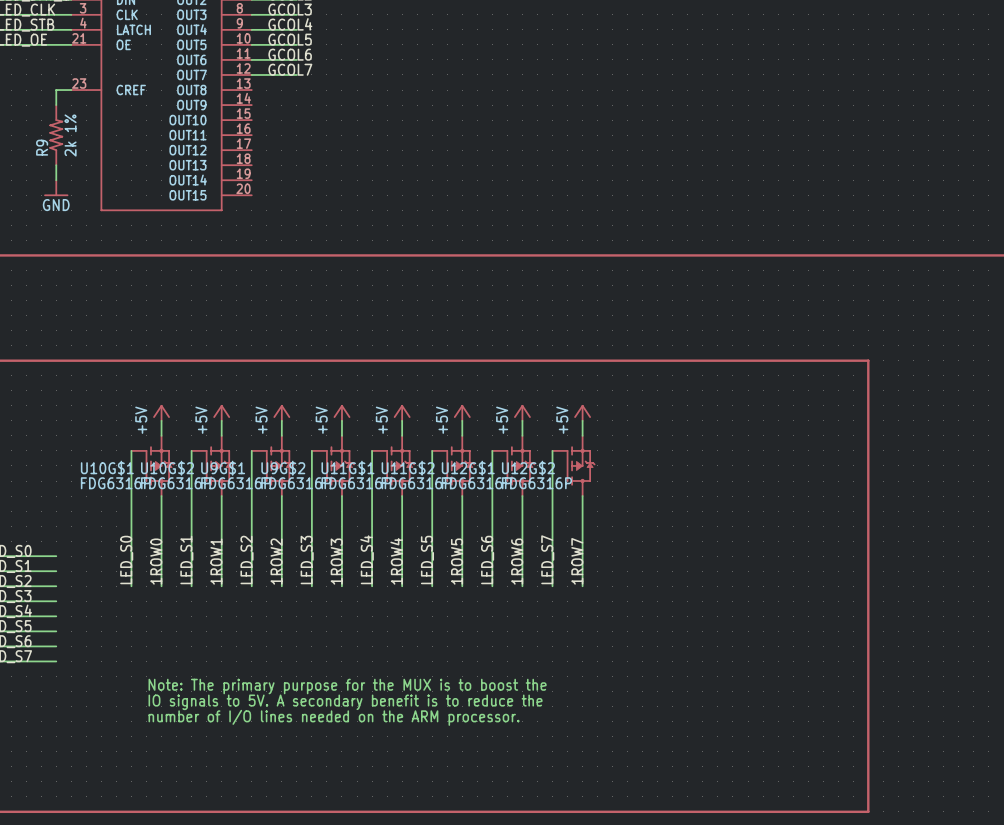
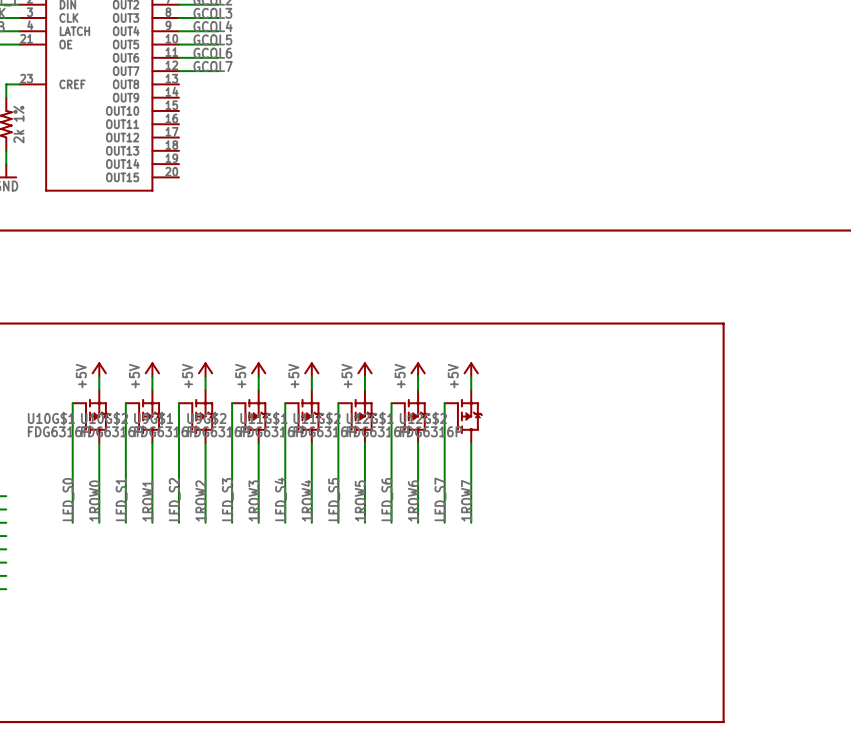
text: Note: The primary purpose for the MUX is to boost the (347, 686) -> none
text: IO signals to 5V. A secondary benefit is to reduce the (345, 702) -> none
text: number of I/O lines needed on the ARM processor. (334, 717) -> none

